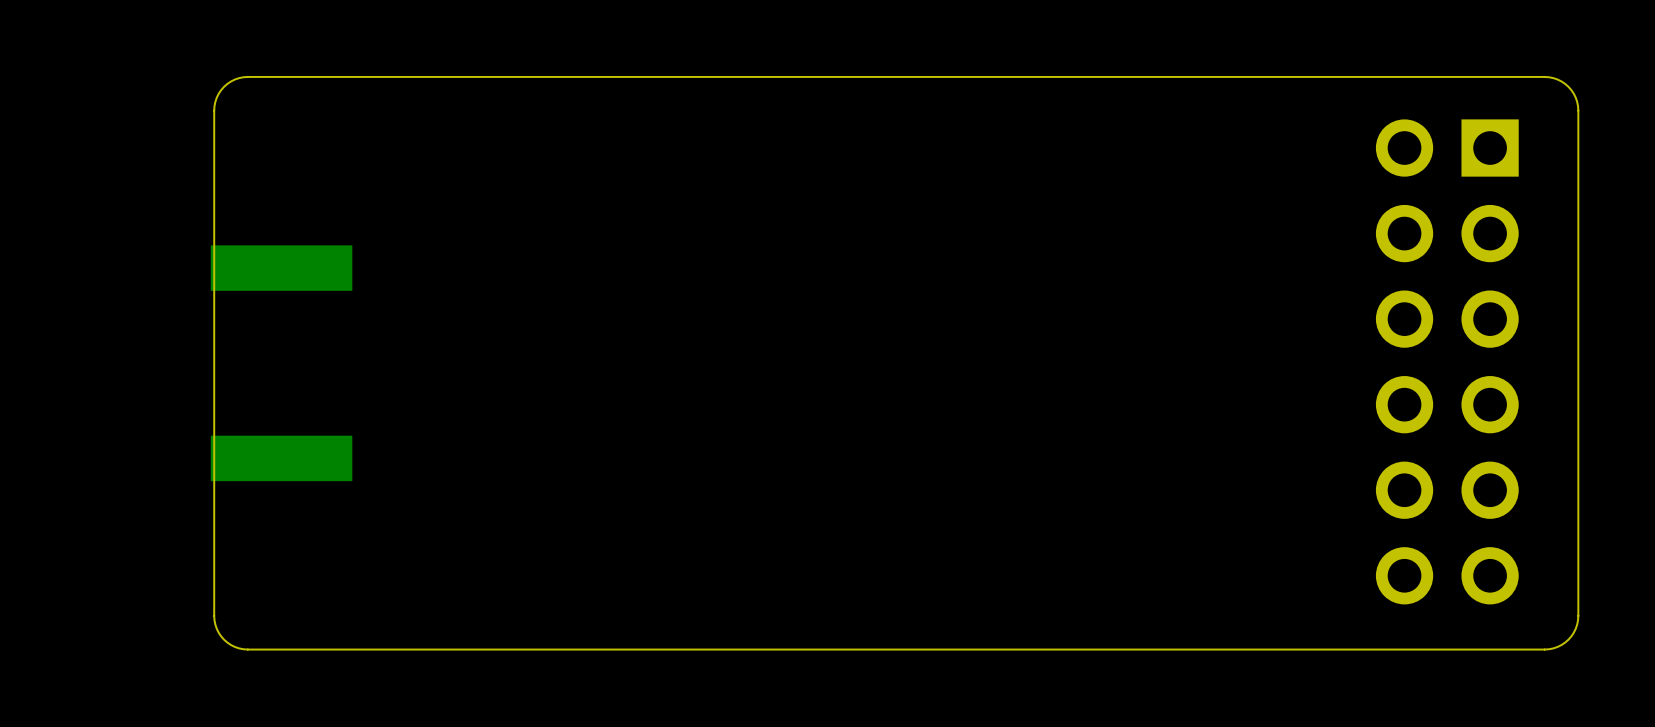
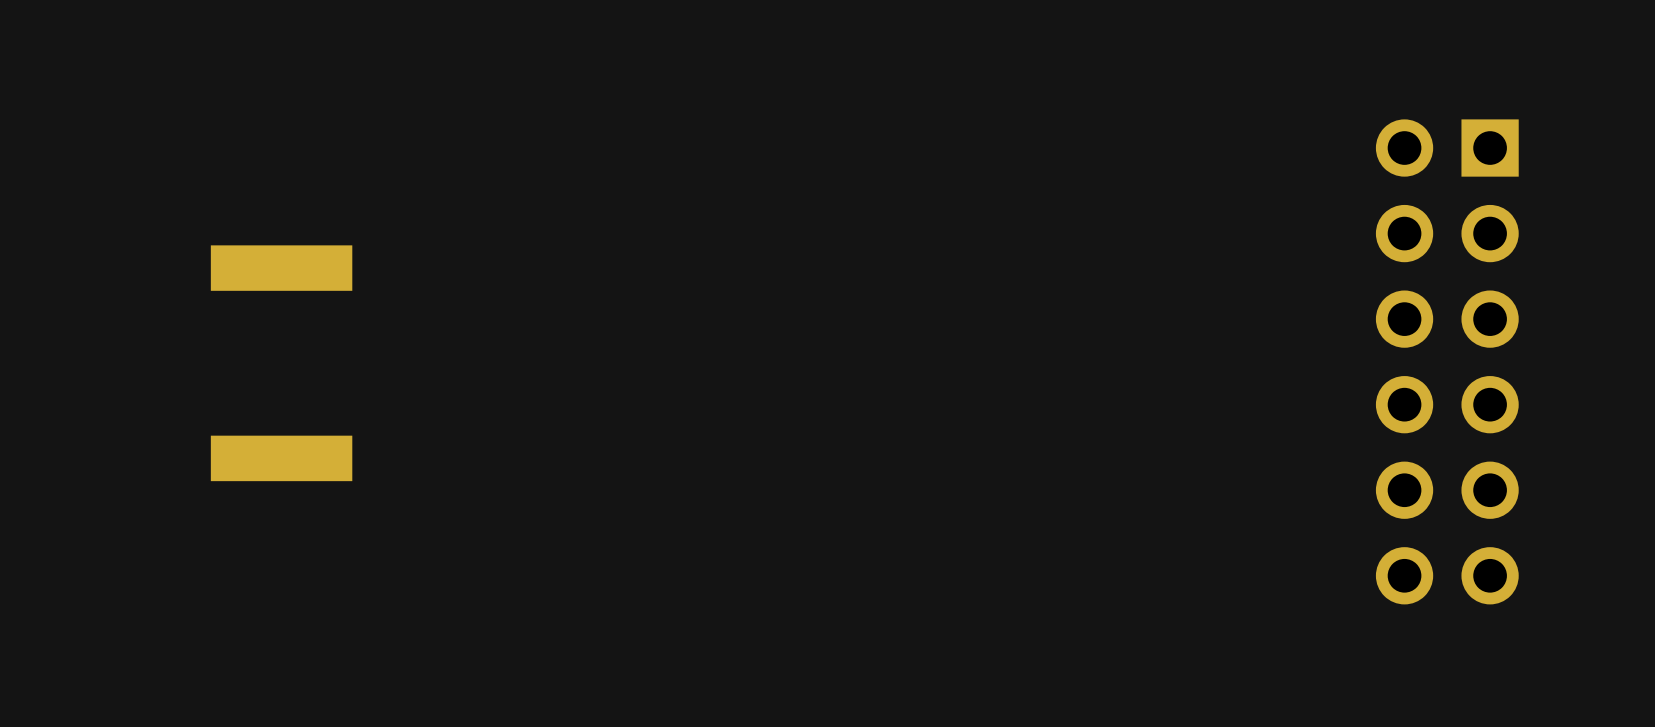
board edge: (1544, 76) (247, 76) (235, 79) (221, 90) (215, 101) (214, 110) (214, 615) (216, 628) (227, 642) (235, 646) (247, 649) (1544, 649) (1557, 646) (1571, 636) (1577, 624) (1578, 615) (1578, 110) (1575, 97) (1568, 86) (1557, 79) (1544, 76) -> none

